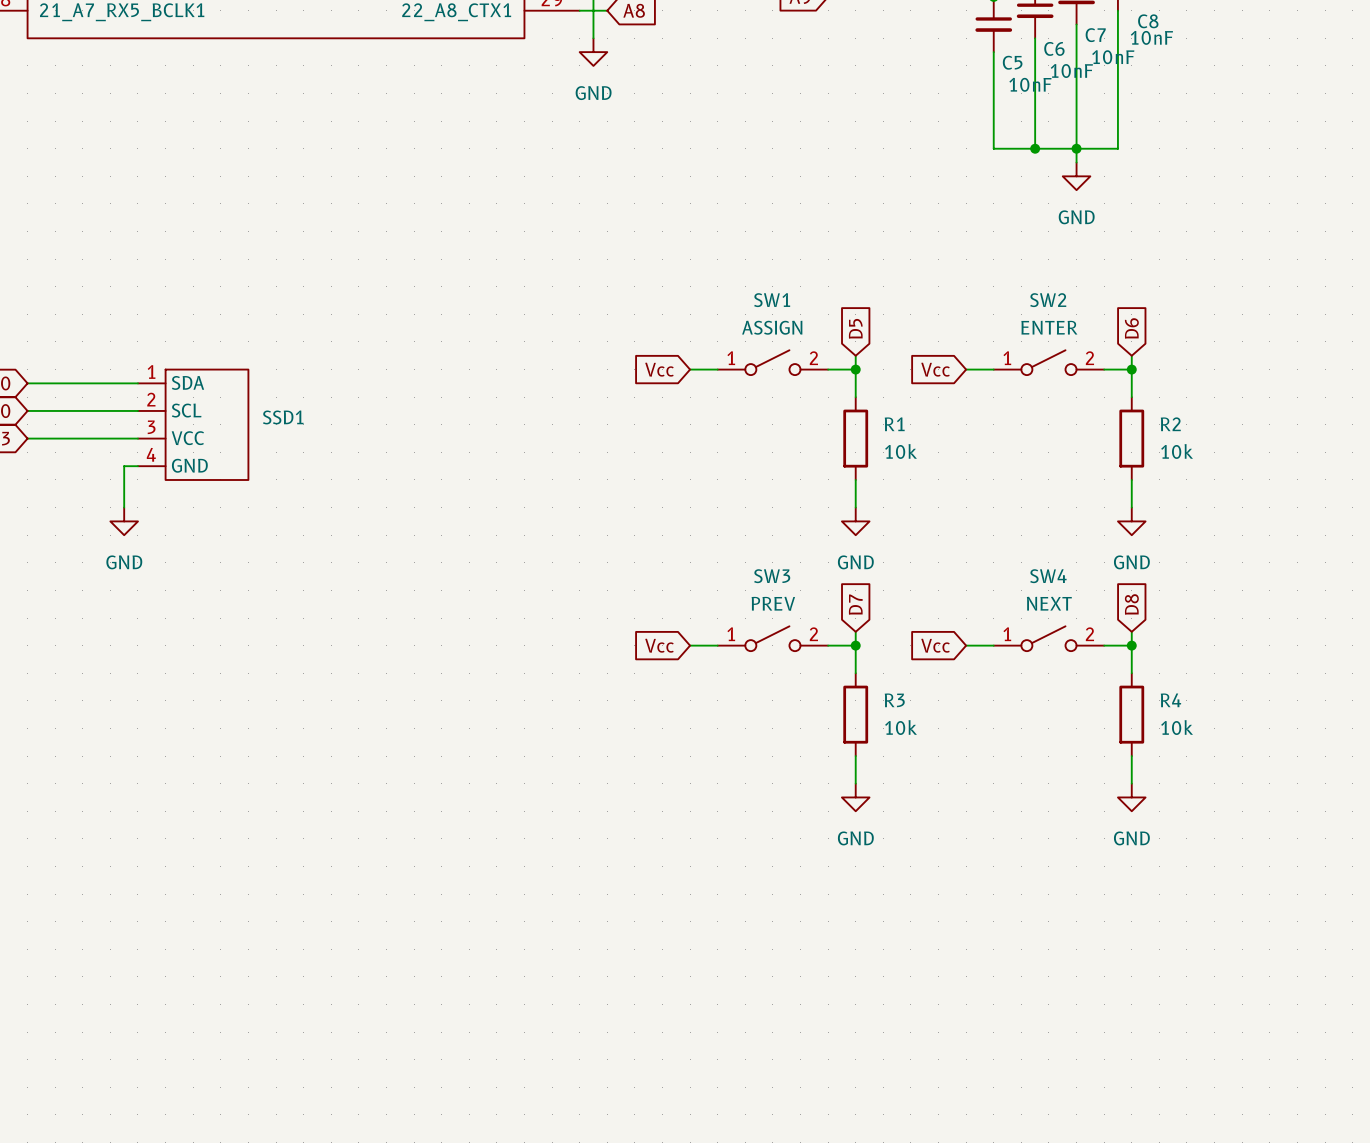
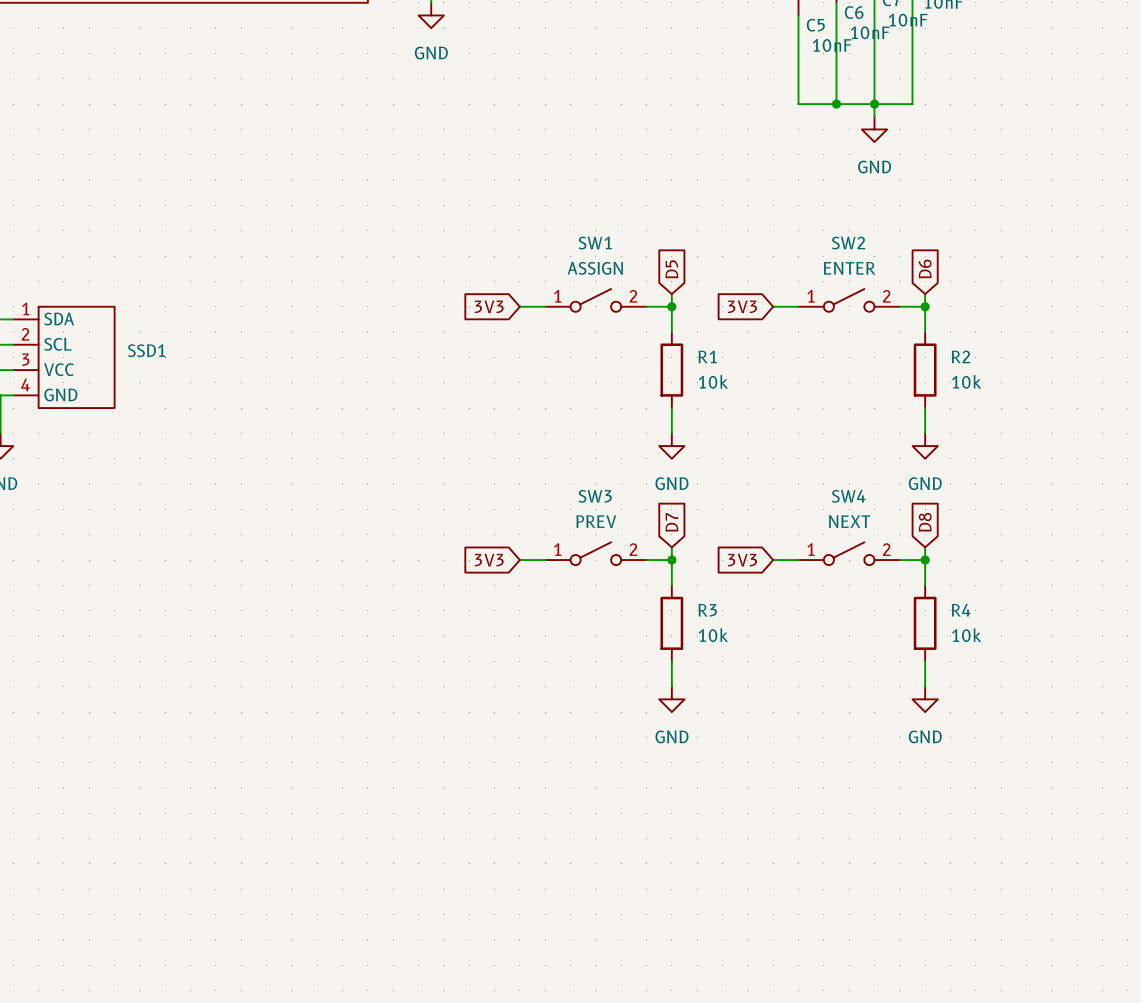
global label: Vcc (659, 369) -> 3V3 (489, 306)
global label: Vcc (935, 369) -> 3V3 (742, 306)
global label: Vcc (659, 645) -> 3V3 (489, 560)
global label: Vcc (935, 645) -> 3V3 (742, 560)

